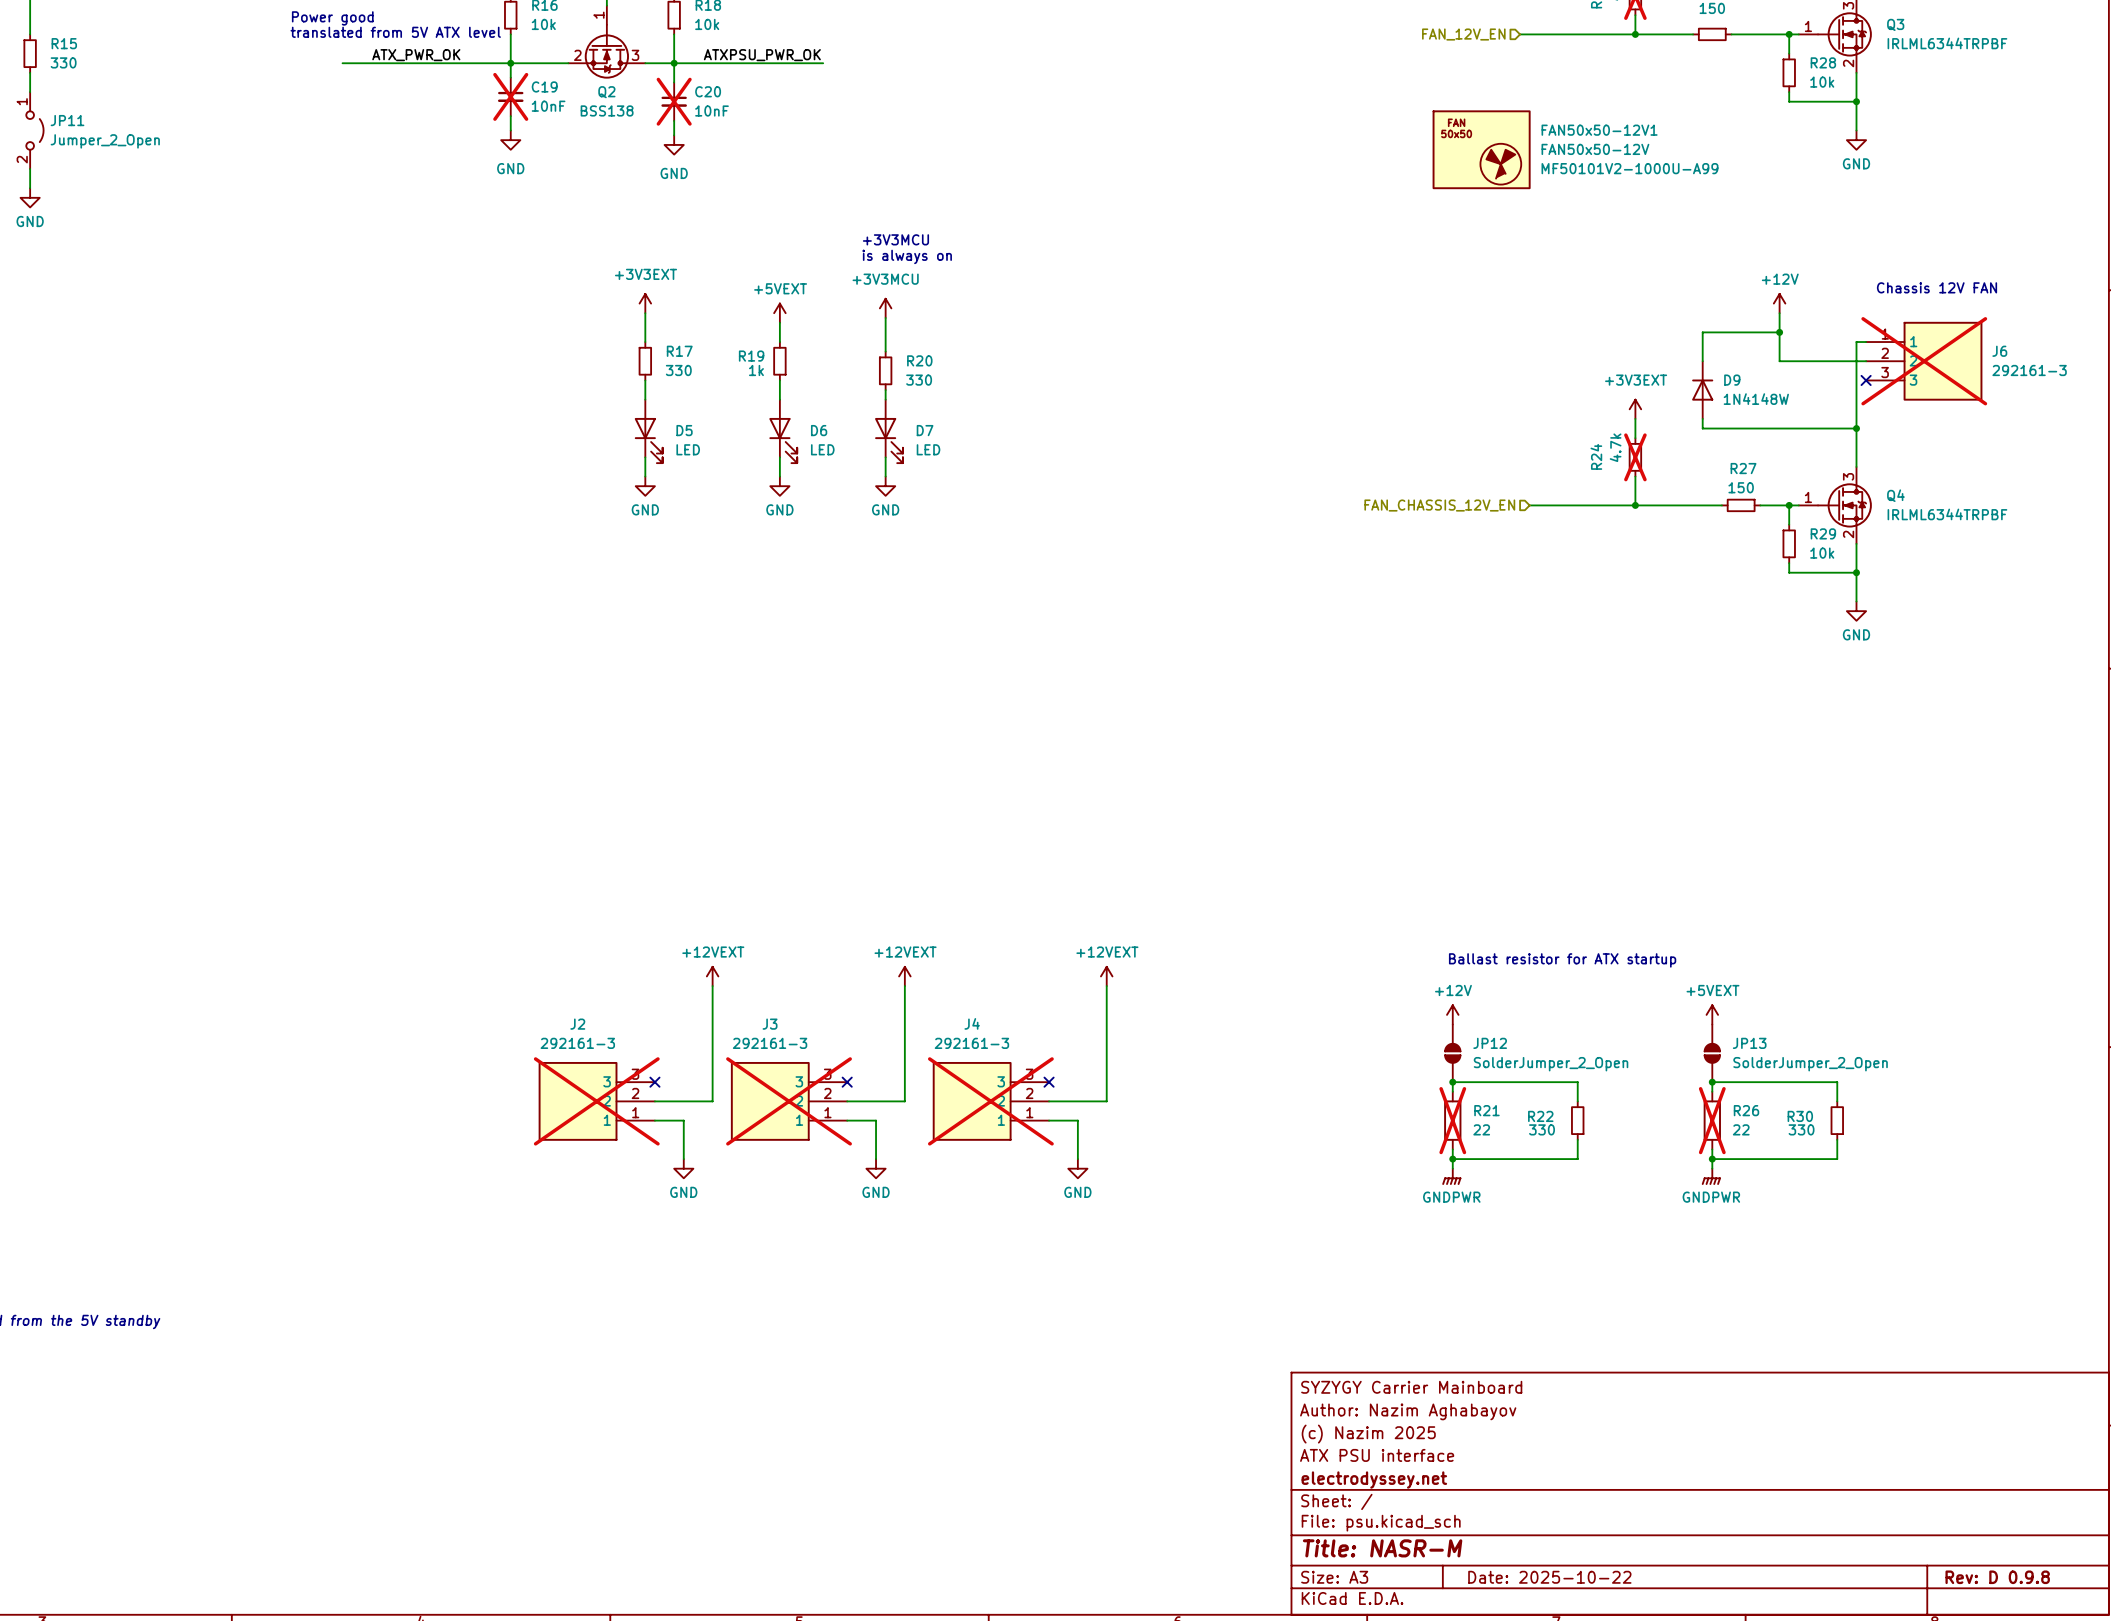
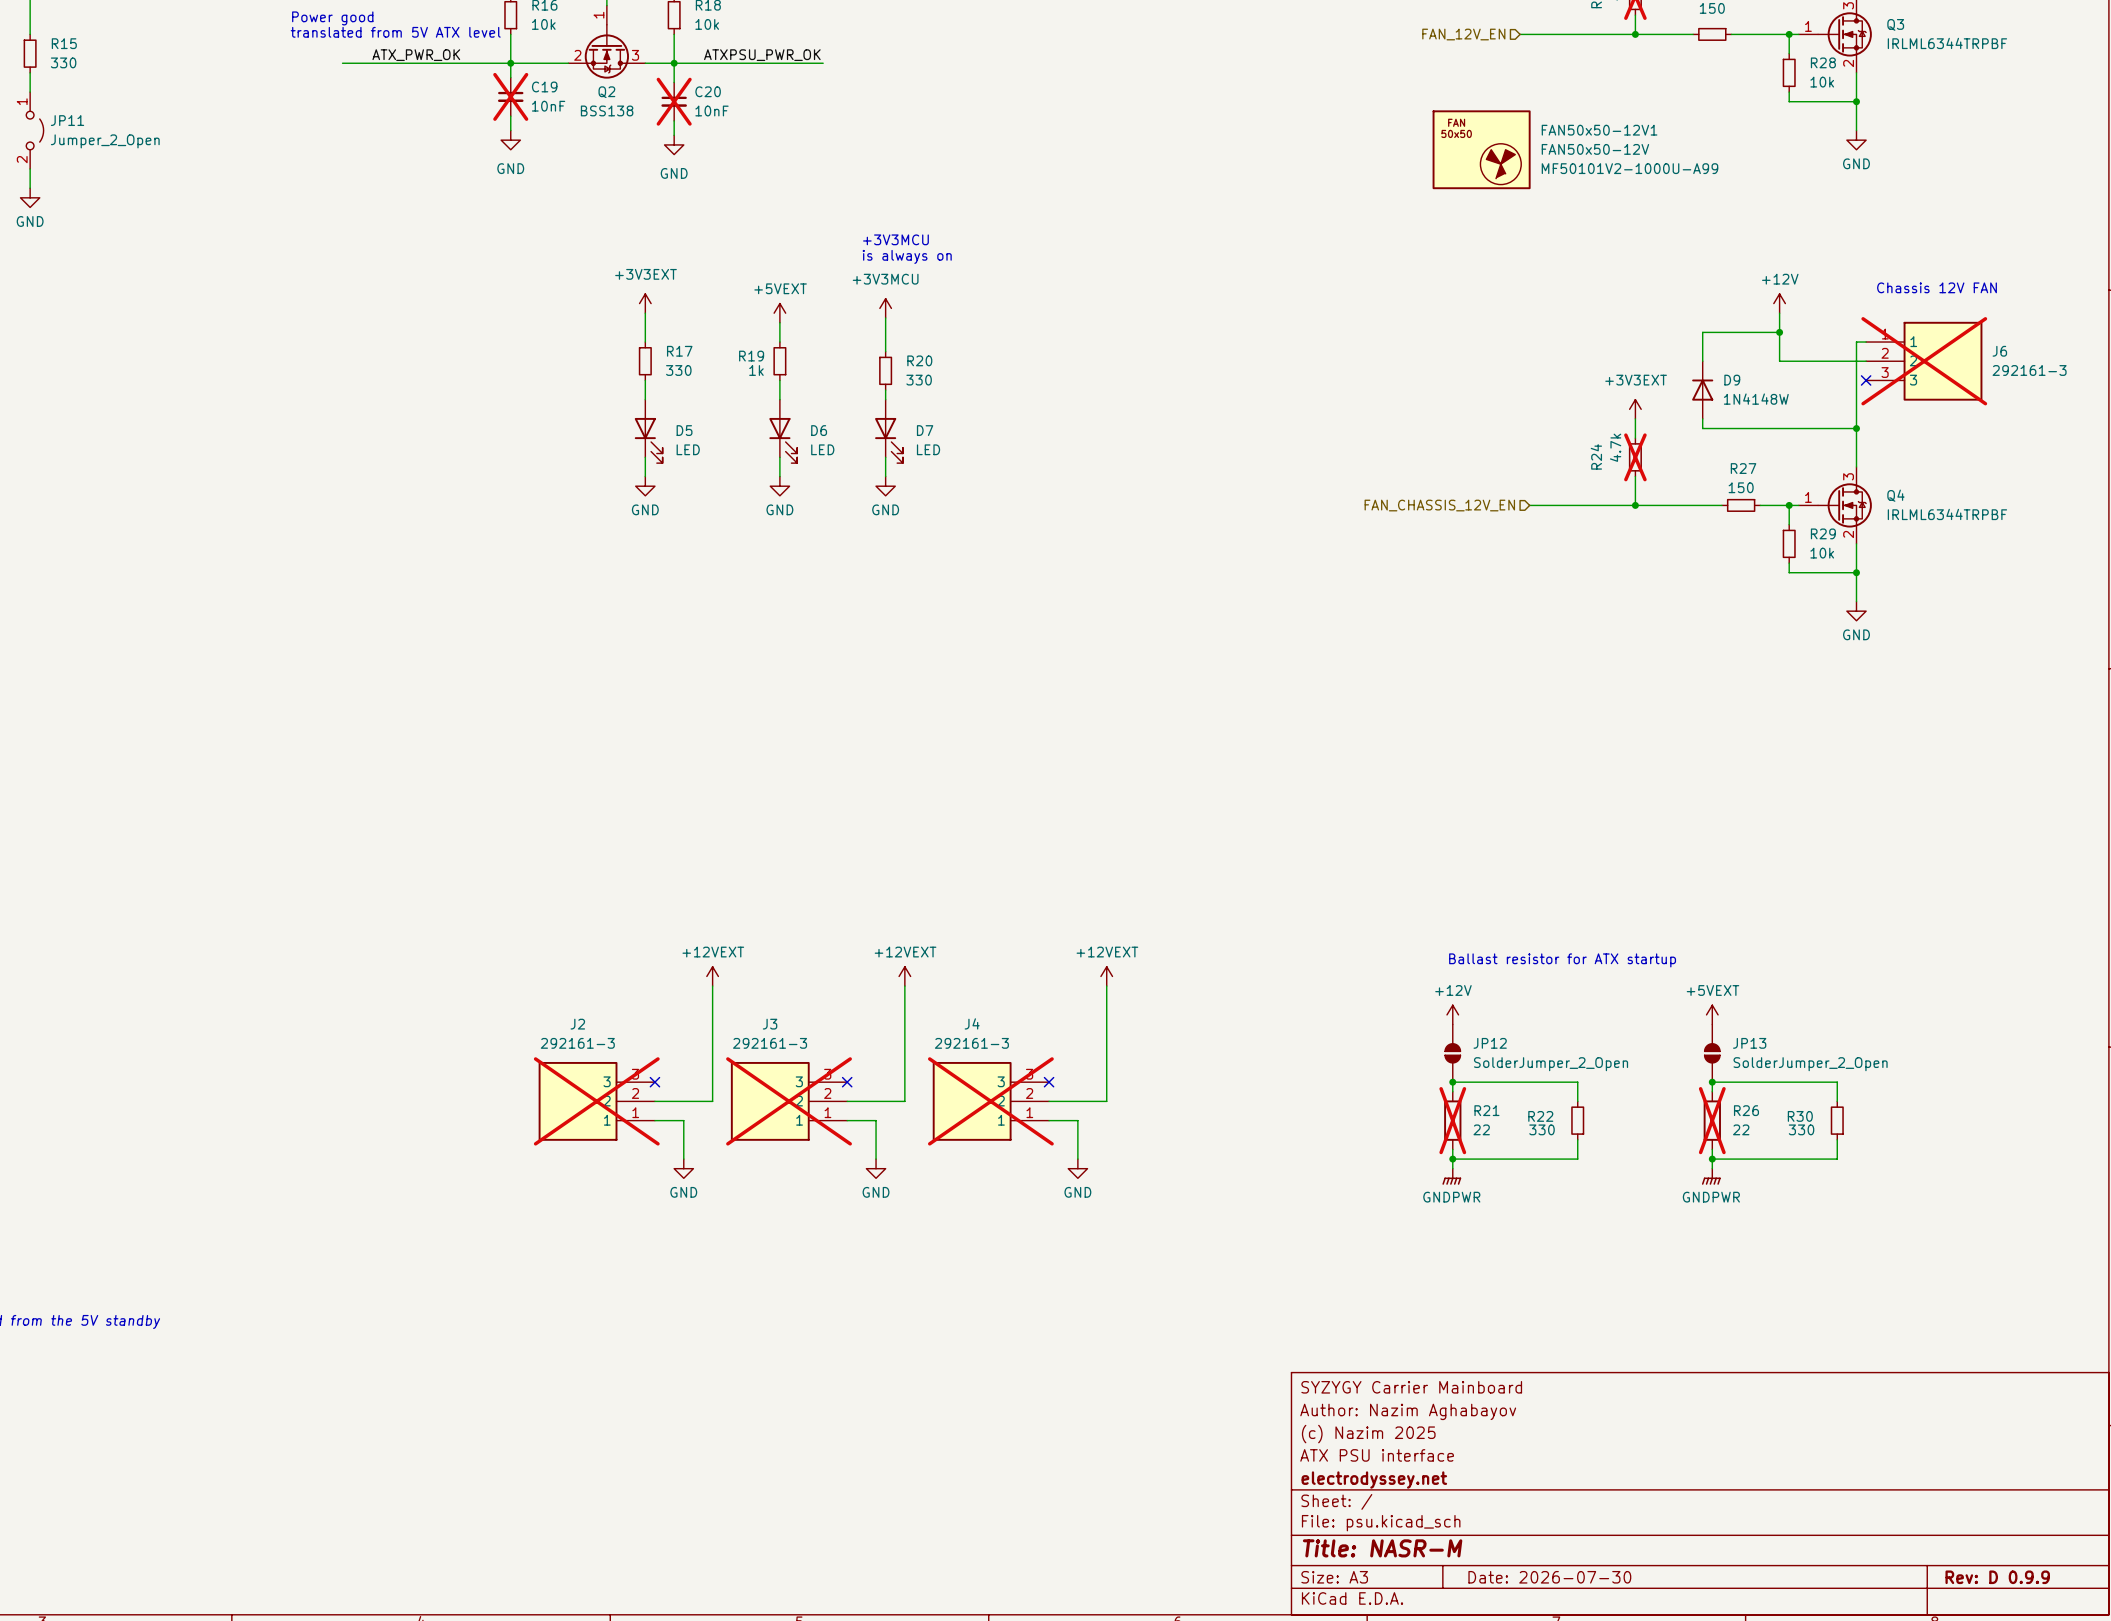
title block: Date: 2025-10-22 (1549, 1577) -> Date: 2026-07-30 (1549, 1577)
title block: Rev: D 0.9.8 (1997, 1577) -> Rev: D 0.9.9 (1997, 1577)

